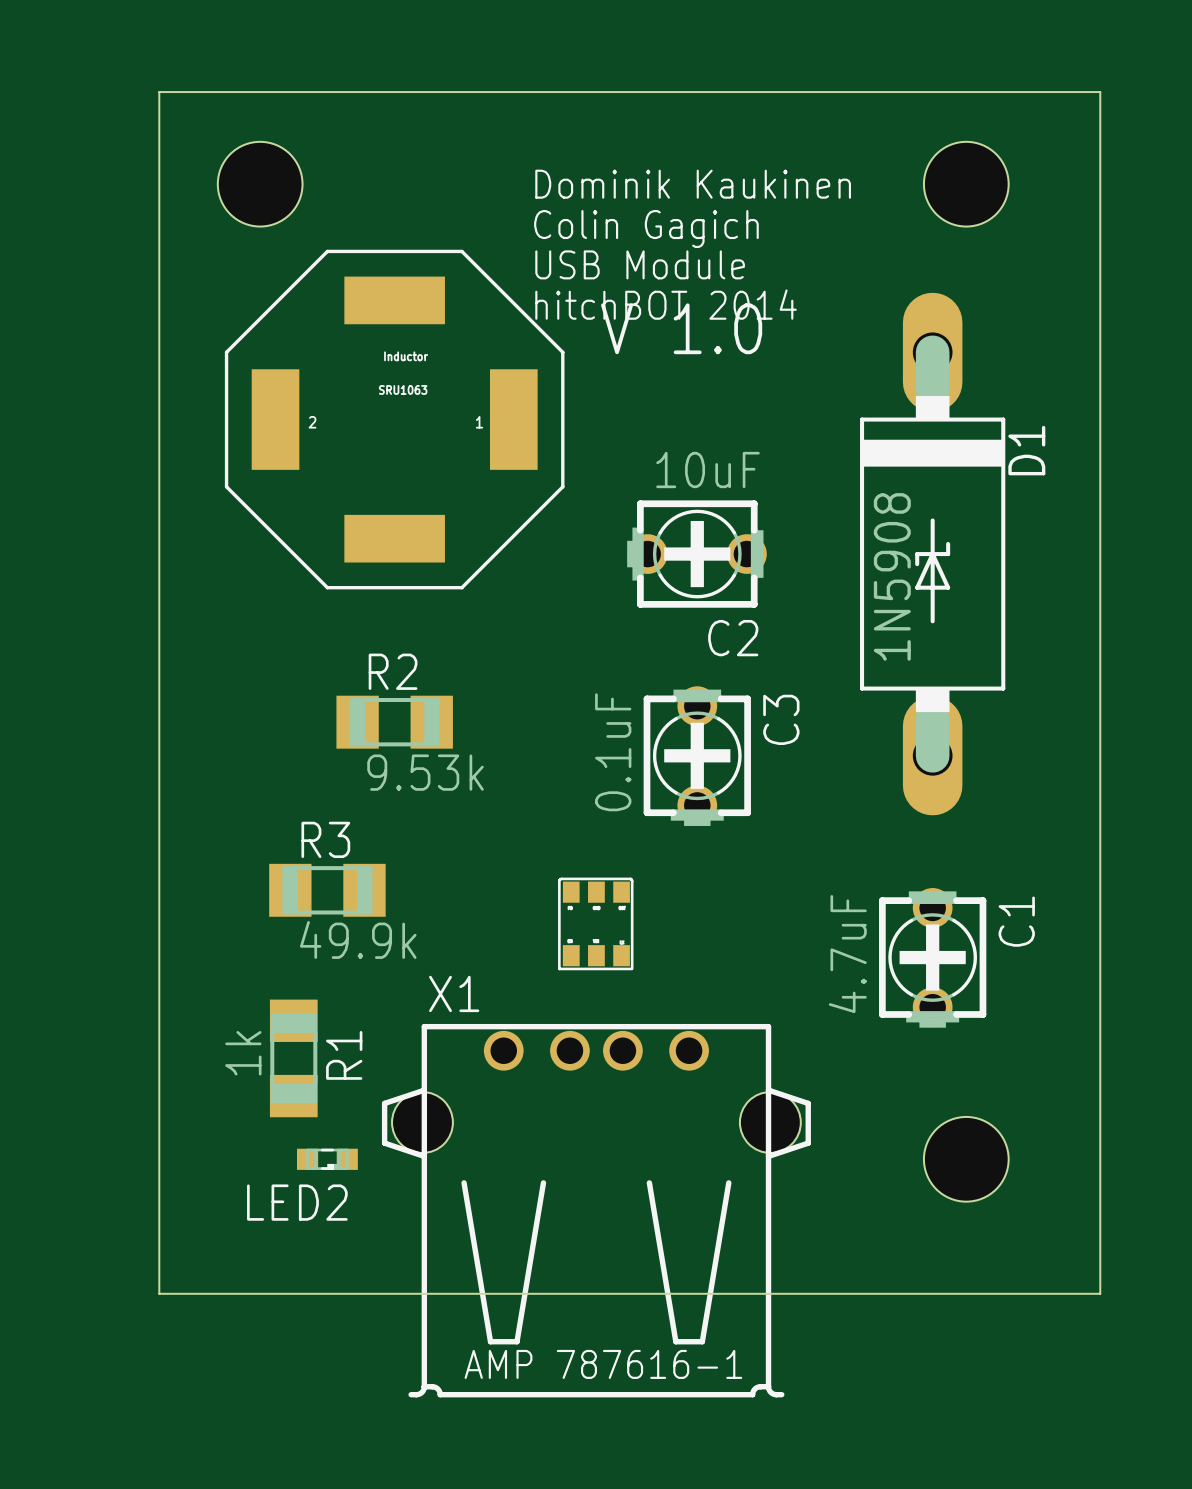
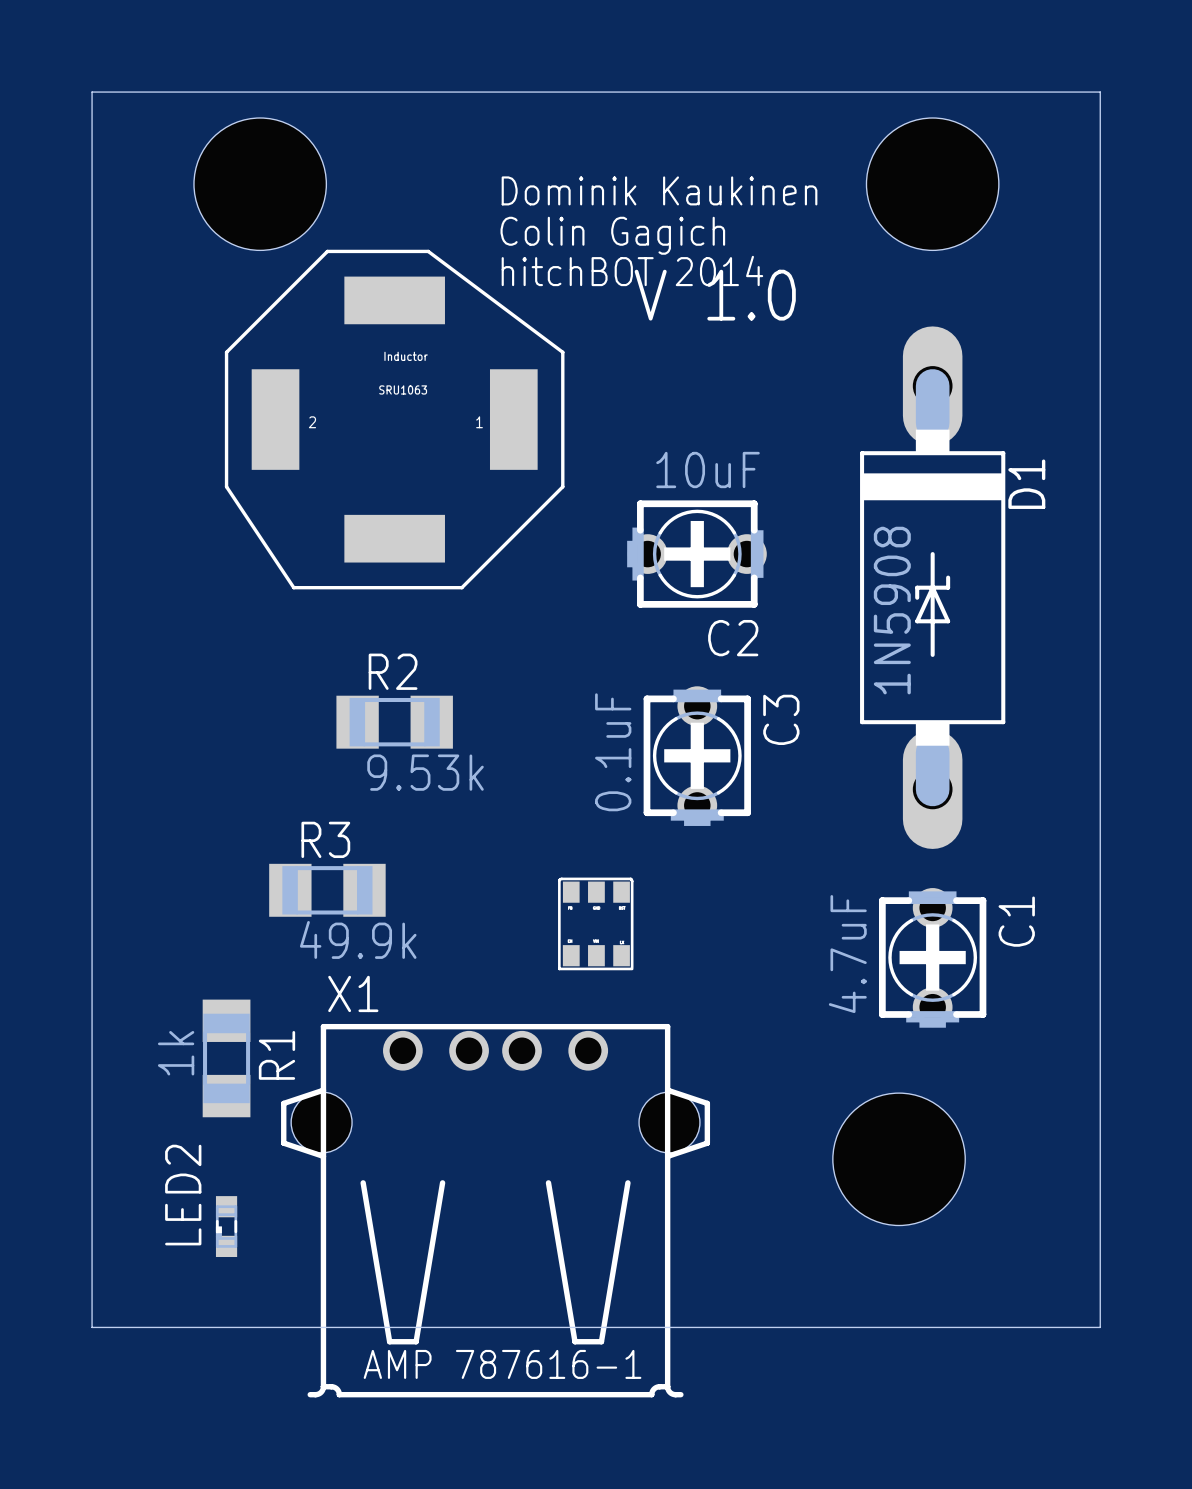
board edge: (159, 92) (159, 1293) (1100, 1293) -> (159, 92) (92, 92) (92, 1327) (1100, 1327) (1100, 1293)
hole size: [217, 141, 303, 227] -> [193, 117, 327, 251]
text position: Dominik Kaukinen (693, 184) -> Dominik Kaukinen (659, 190)
hole: none -> (932, 184)
hole: (966, 184) -> none
text position: Colin Gagich (646, 229) -> Colin Gagich (612, 235)
part footprint: [224, 249, 565, 590] -> [224, 249, 565, 590]
text: USB Module (640, 264) -> none
text position: hitchBOT 2014 (666, 304) -> hitchBOT 2014 (632, 270)
text position: V 1.0 (681, 328) -> V 1.0 (715, 295)
D1 position: (932, 554) -> (932, 587)
R1 position: (293, 1058) -> (226, 1058)
LED2 rotation: 0° (327, 1159) -> 90° clockwise (226, 1226)
LED2 position: (327, 1159) -> (226, 1226)
hole: none -> (899, 1159)
hole: (966, 1159) -> none
X1 position: (596, 1210) -> (495, 1210)

